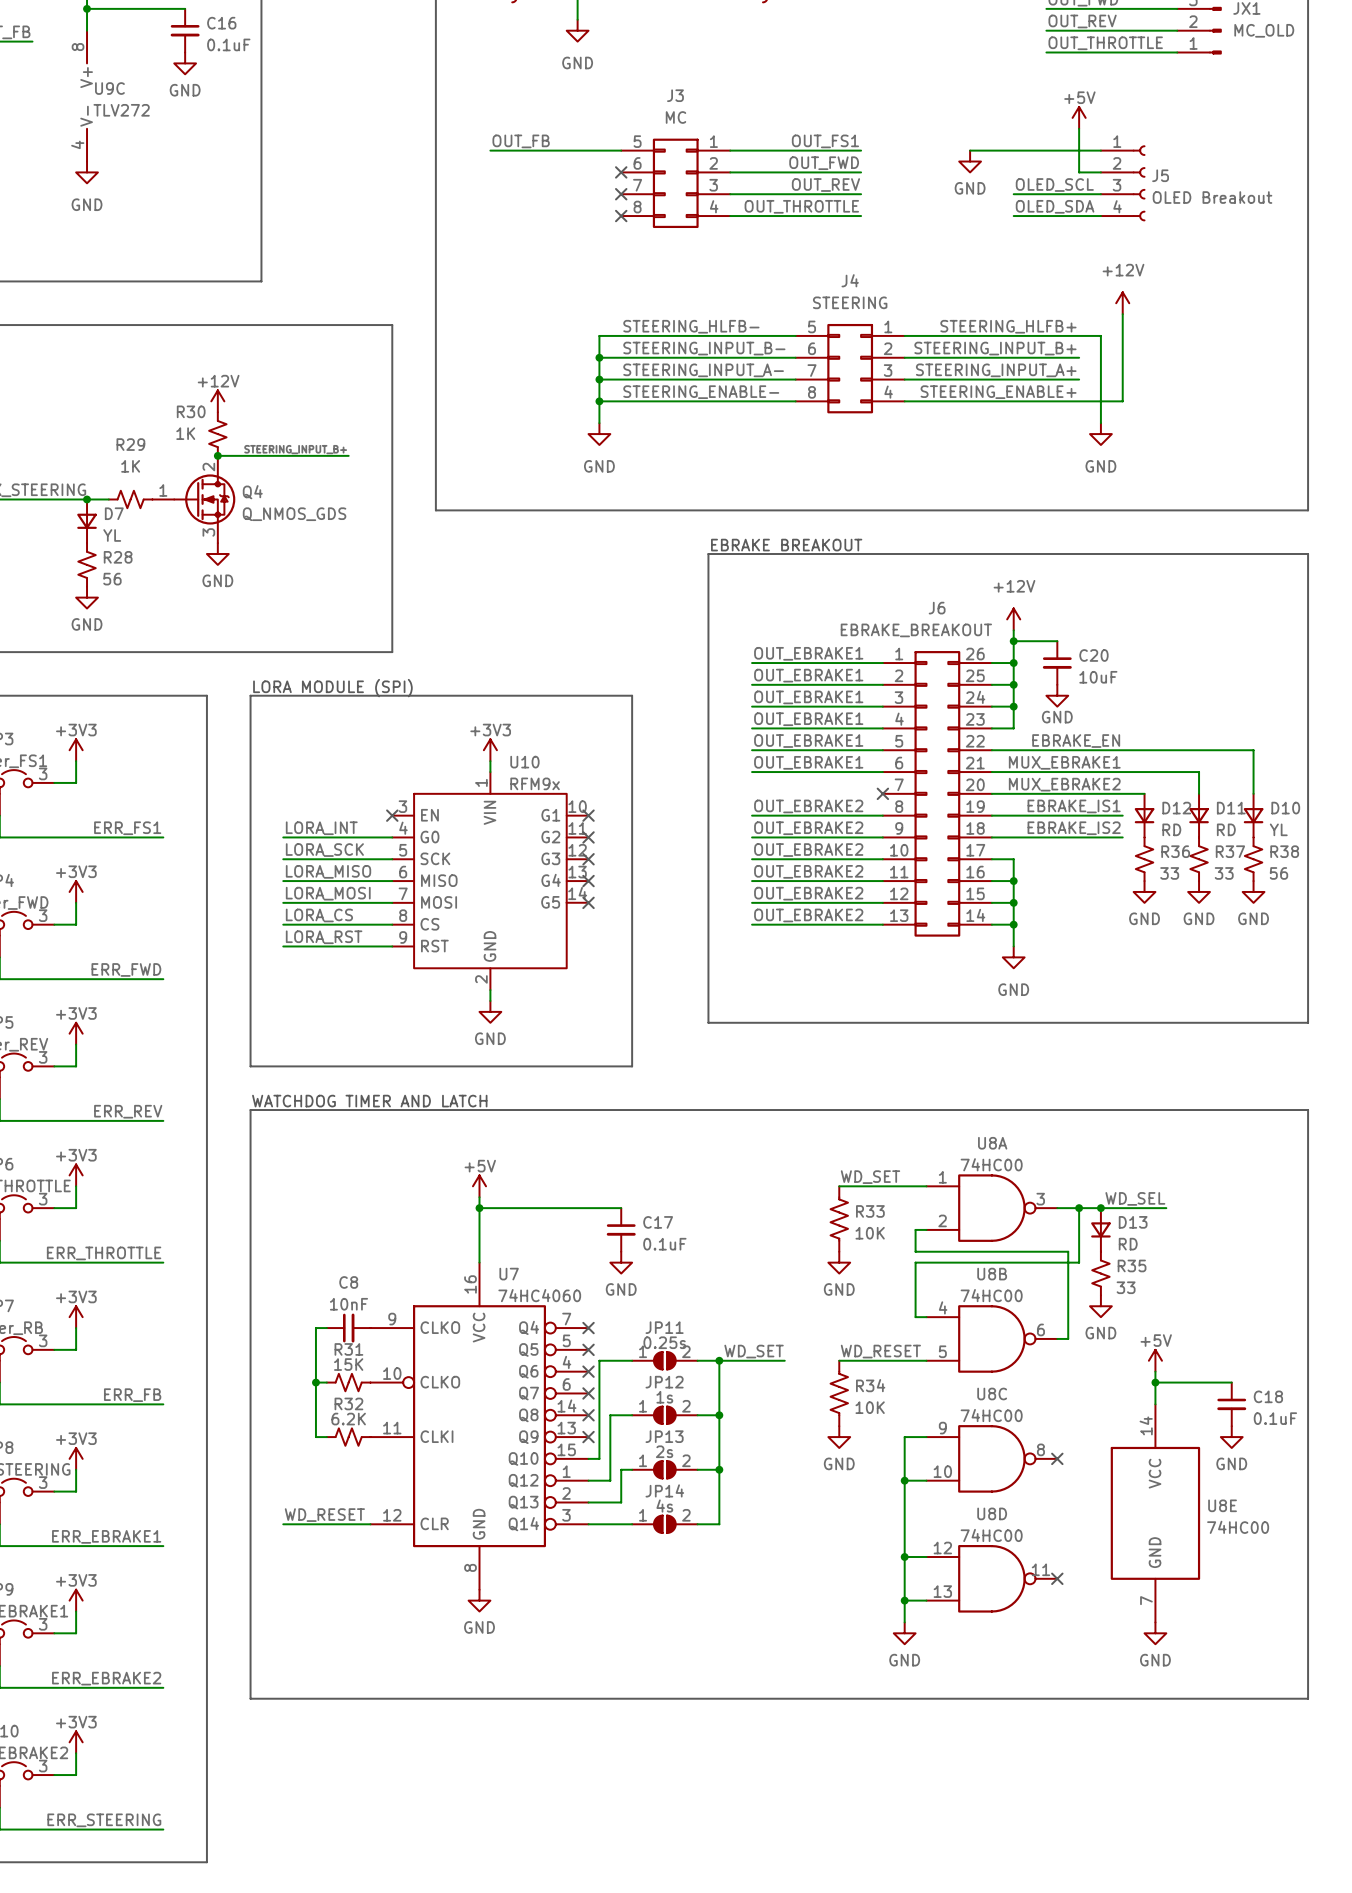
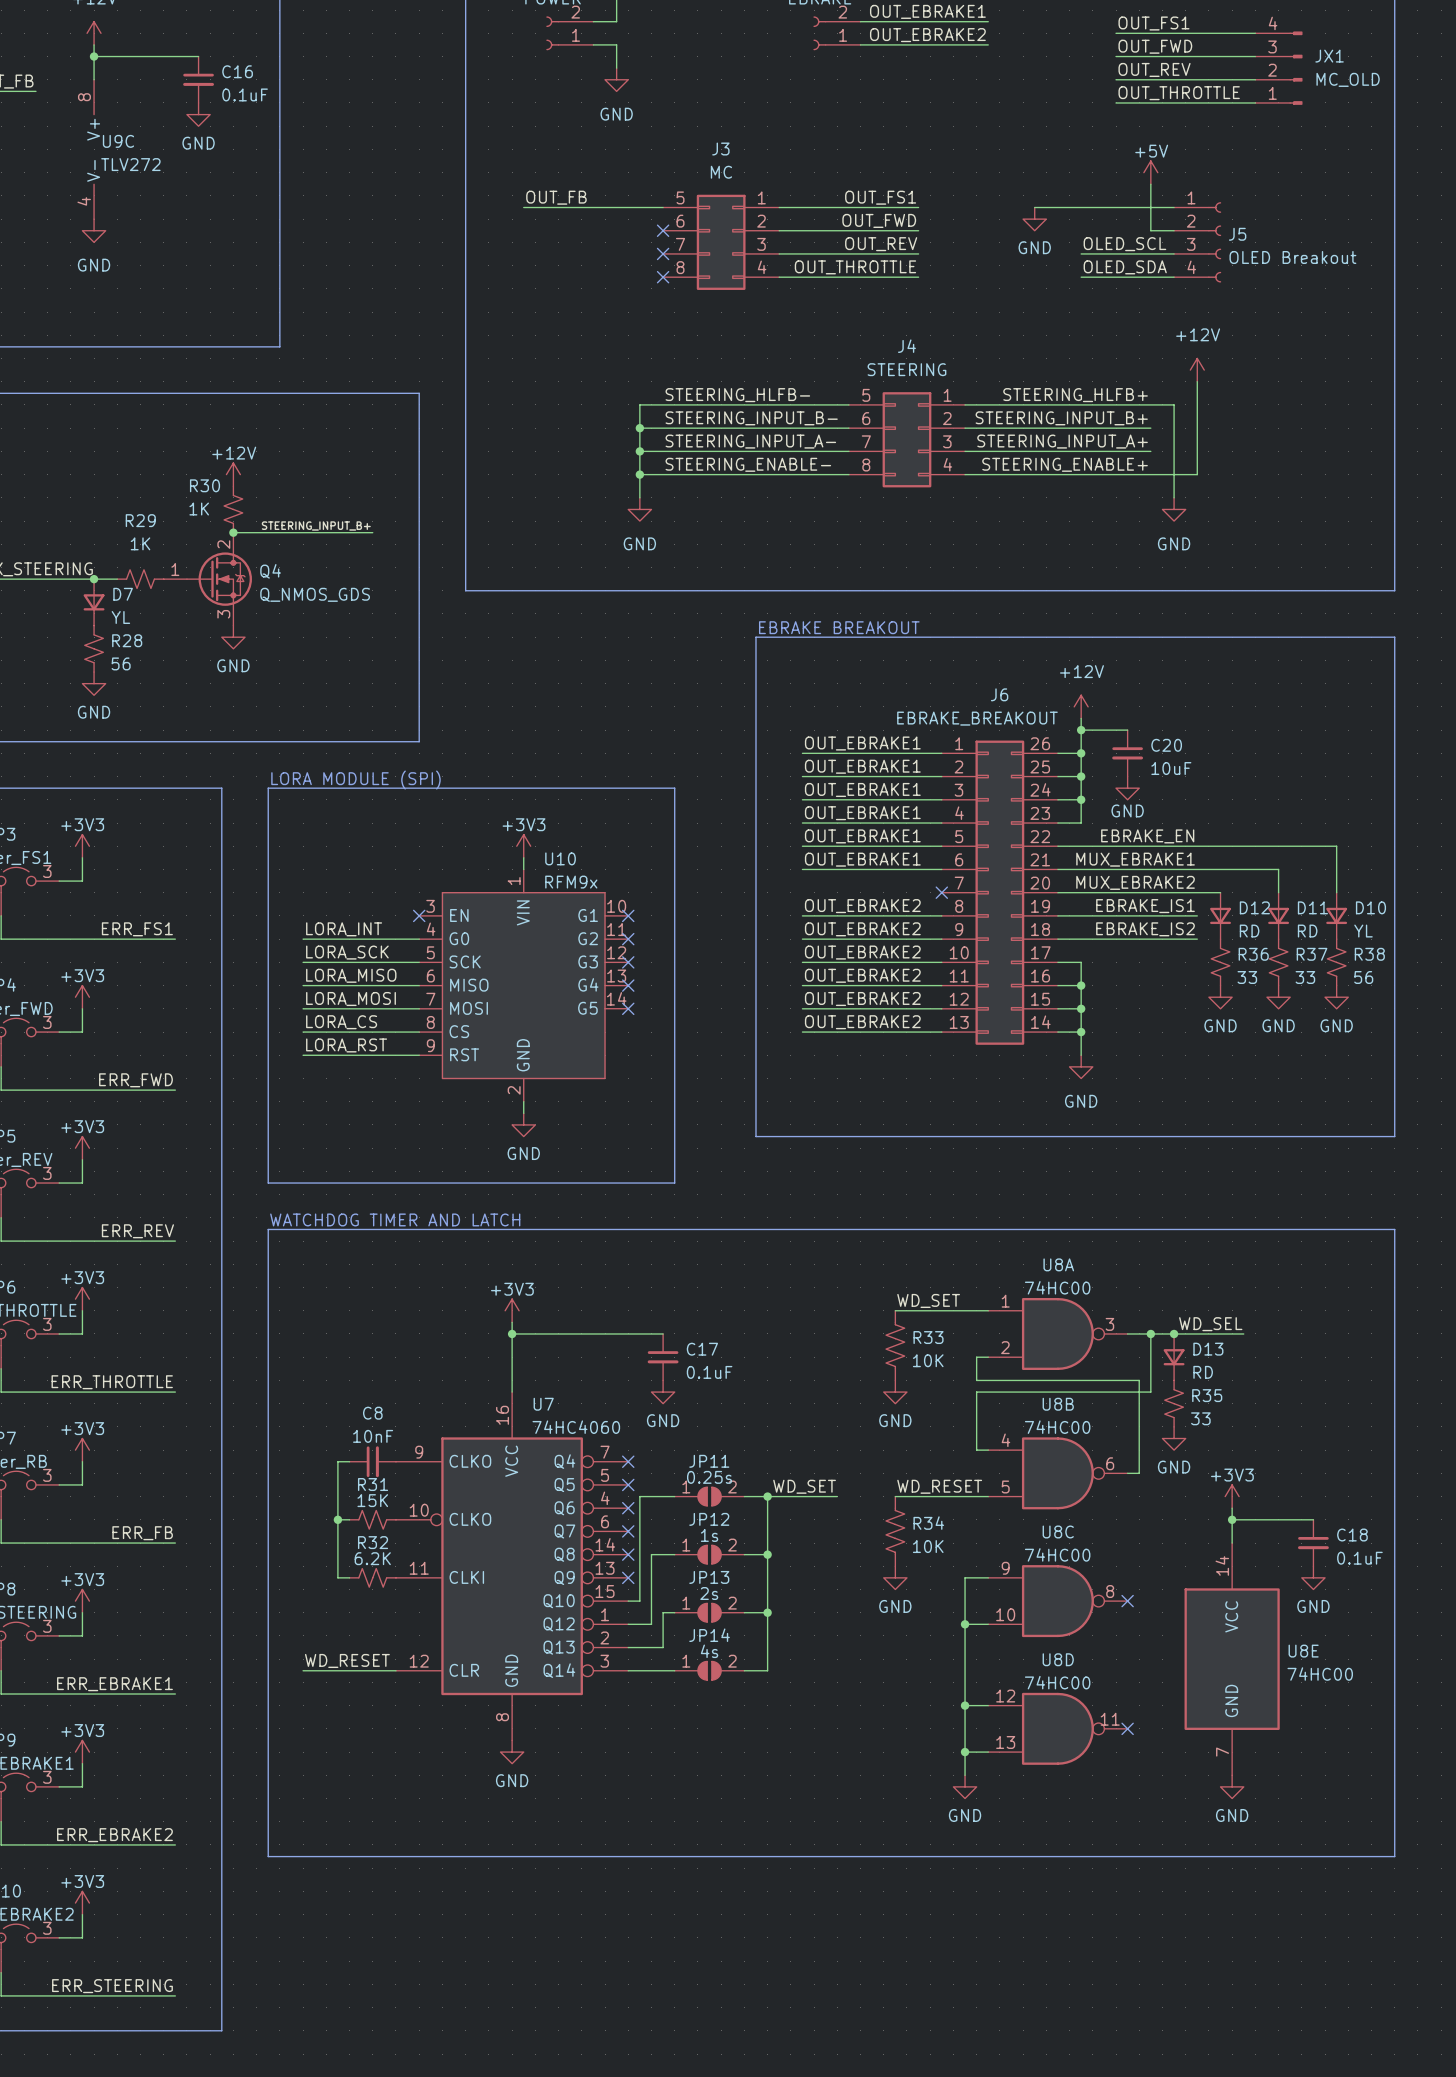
power symbol: +5V (479, 1186) -> +3V3 (512, 1310)
power symbol: +5V (1155, 1360) -> +3V3 (1232, 1496)

